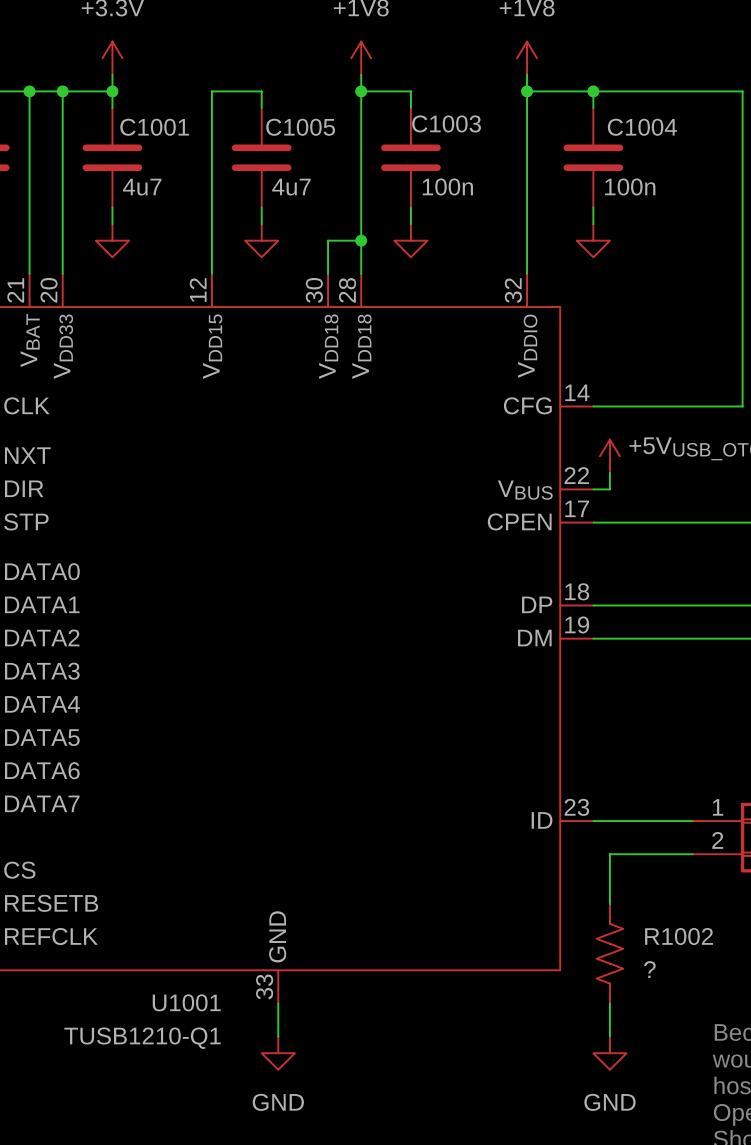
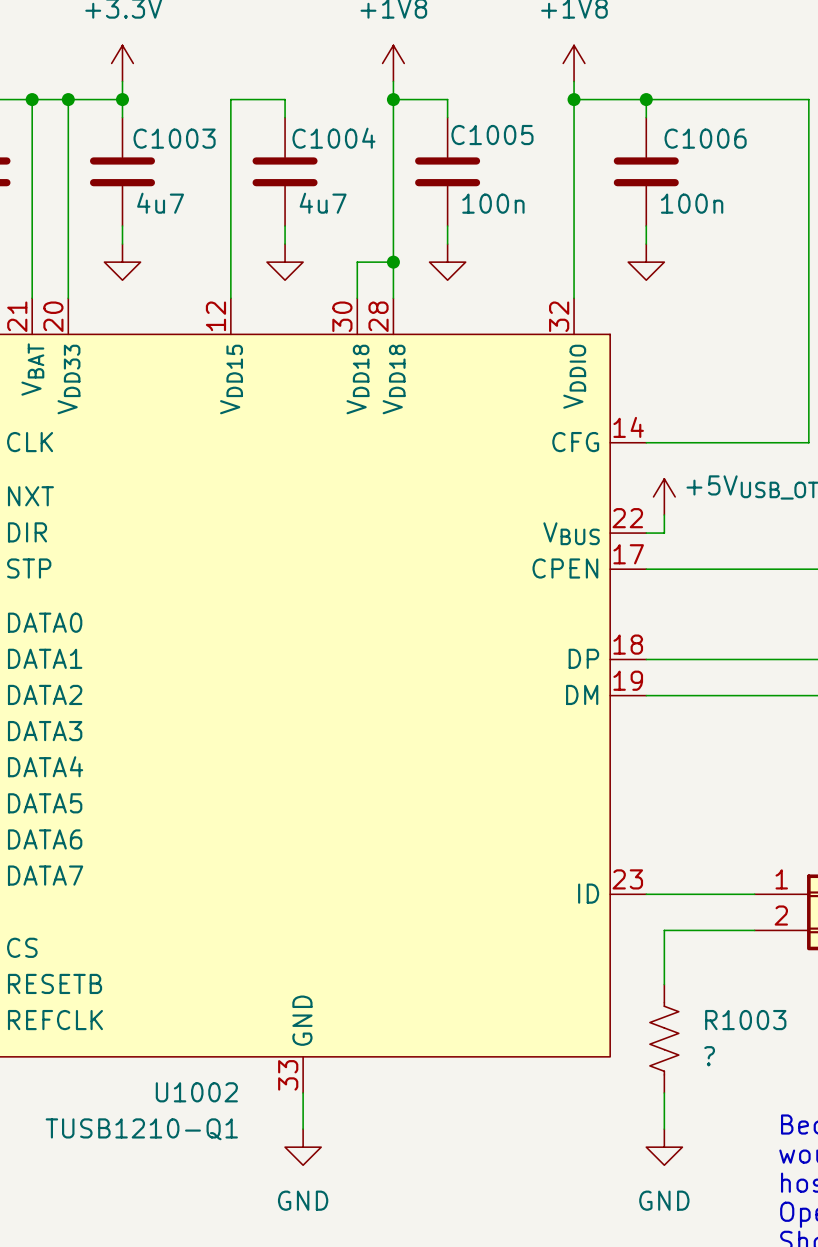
C1003 name: C1003 (446, 123) -> C1005 (492, 135)
C1001 name: C1001 (154, 127) -> C1003 (174, 138)
C1005 name: C1005 (300, 127) -> C1004 (333, 138)
C1004 name: C1004 (642, 127) -> C1006 (705, 138)
R1002 name: R1002 (679, 936) -> R1003 (745, 1020)
U1001 name: U1001 (186, 1002) -> U1002 (196, 1092)

